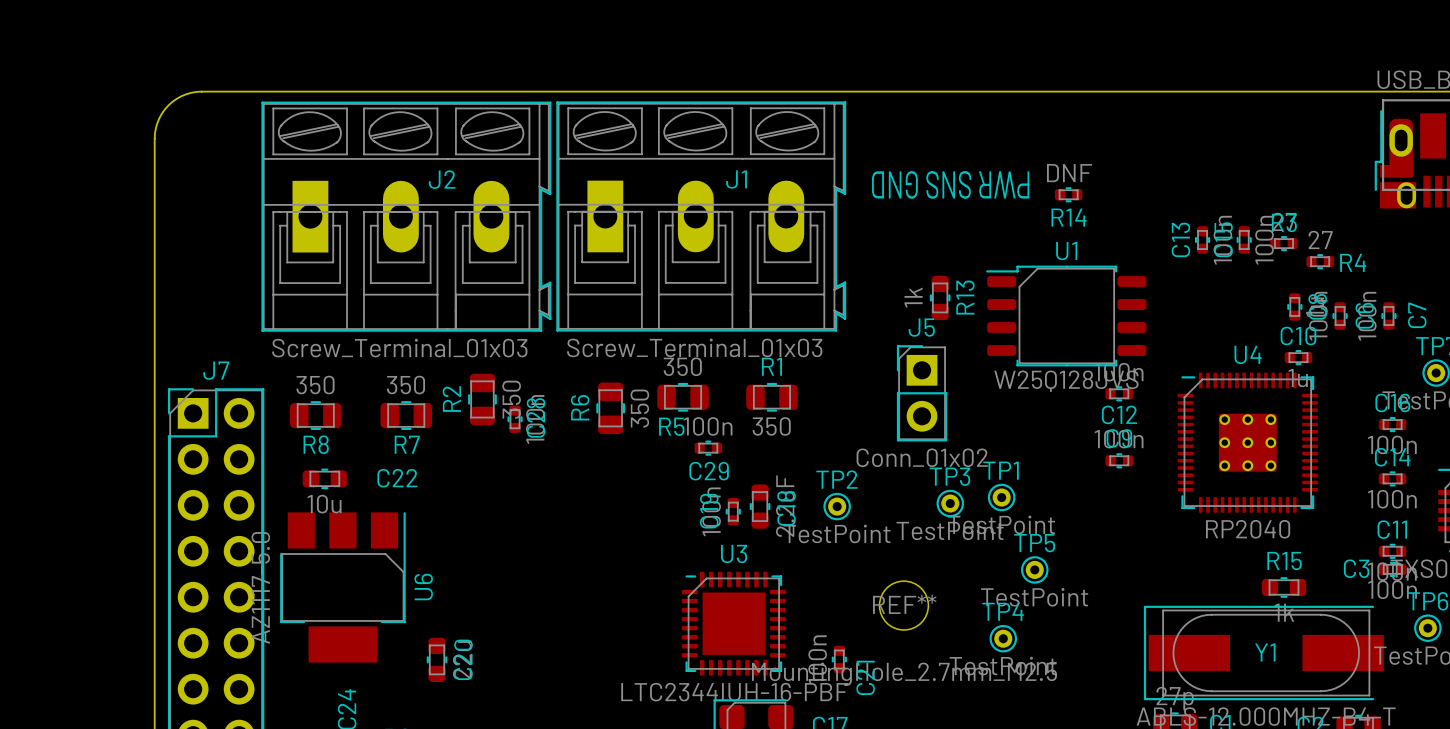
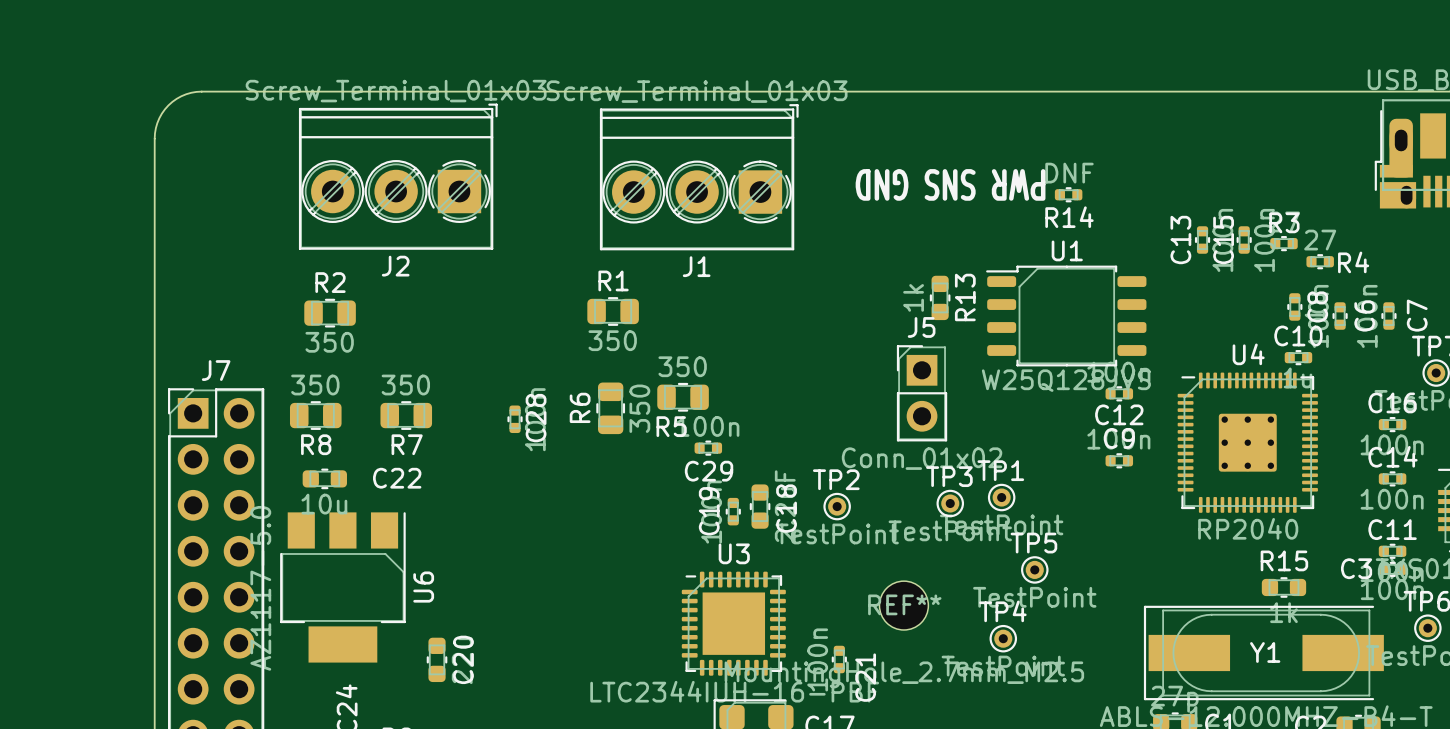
J2 footprint: [261, 101, 552, 332] -> [298, 103, 498, 250]
J1 footprint: [556, 101, 847, 332] -> [599, 104, 799, 251]
J2 name position: J2 (442, 179) -> J2 (395, 266)
J1 name position: J1 (736, 179) -> J1 (696, 266)
J1 value position: Screw_Terminal_01x03 (694, 347) -> Screw_Terminal_01x03 (697, 91)
J2 value position: Screw_Terminal_01x03 (399, 348) -> Screw_Terminal_01x03 (396, 91)
R1 position: (771, 397) -> (613, 311)
R2 rotation: 0° (482, 399) -> 90° clockwise (330, 313)
R2 position: (482, 399) -> (330, 313)

